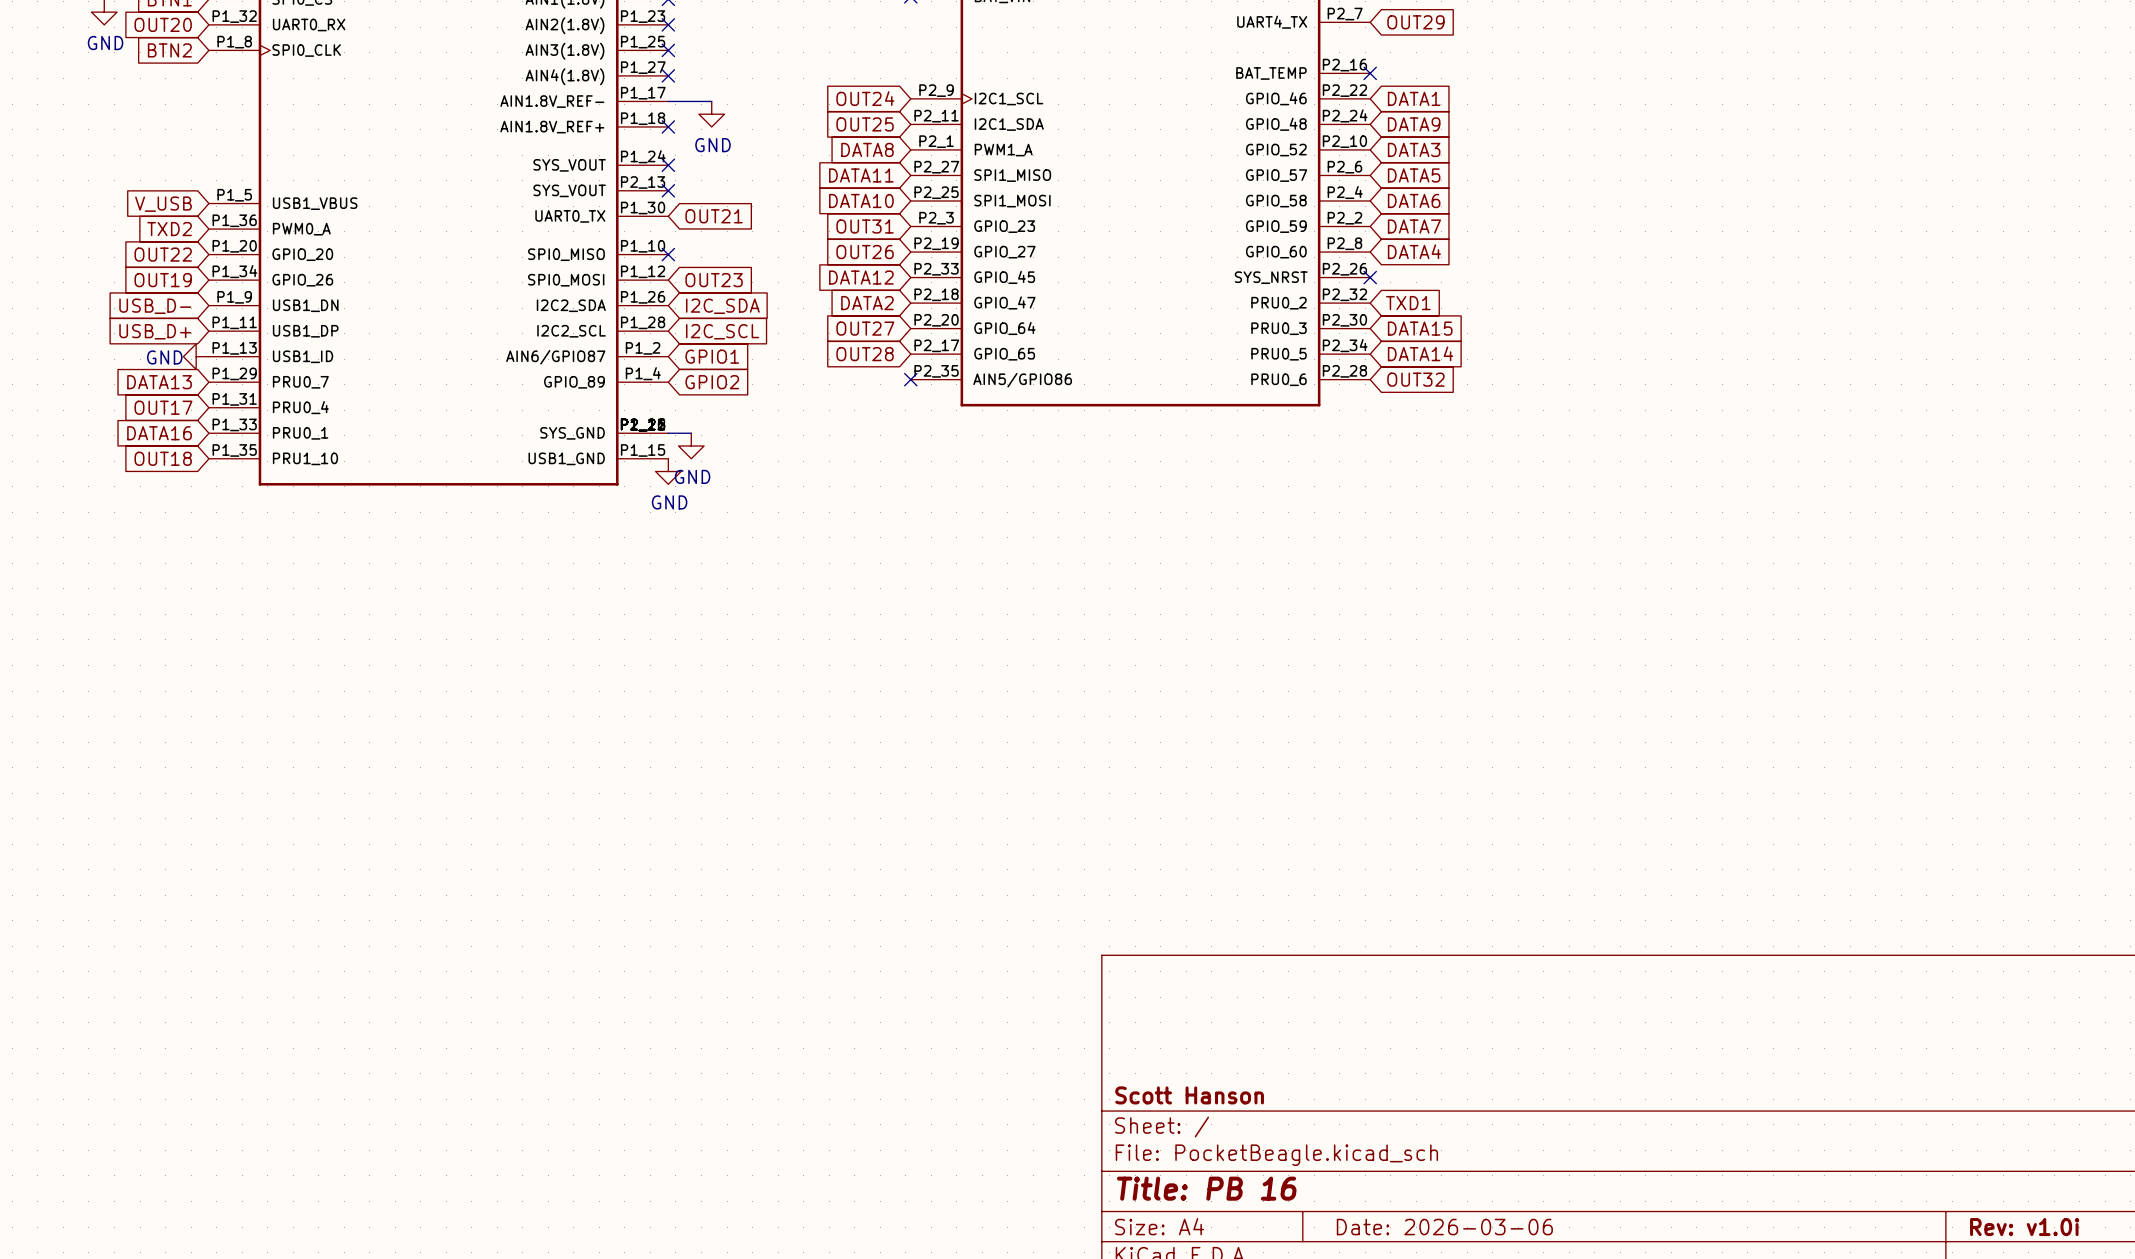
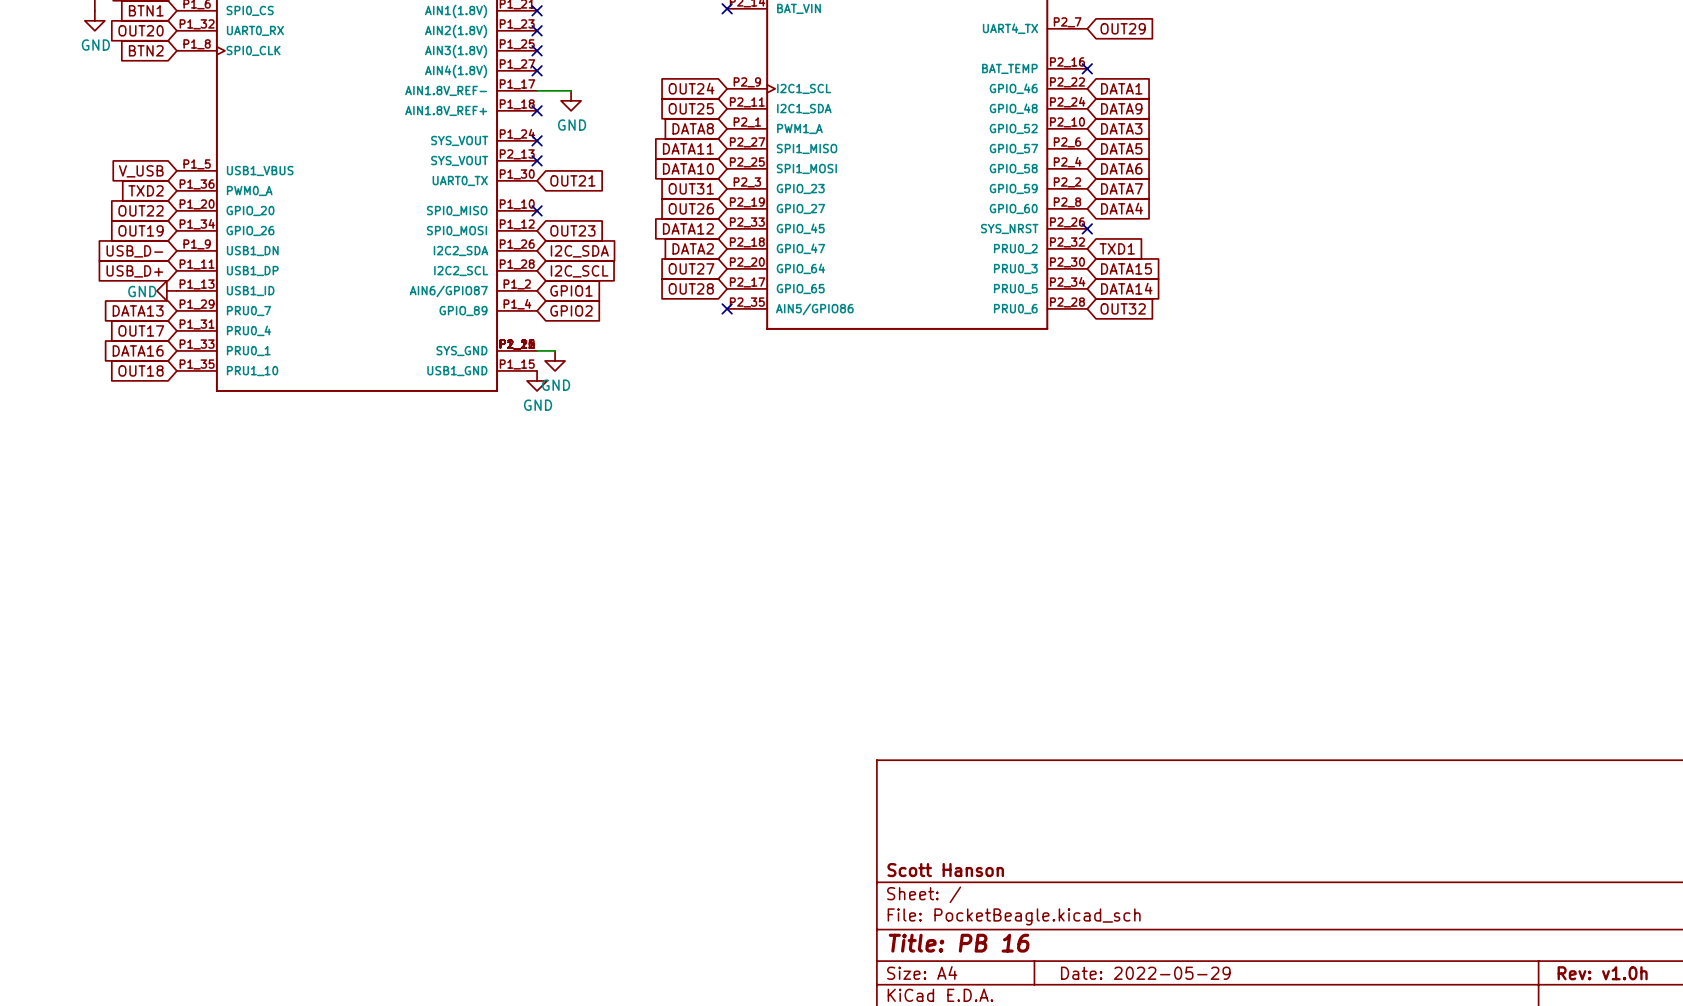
title block: Date: 2026-03-06 (1444, 1227) -> Date: 2022-05-29 (1145, 973)
title block: Rev: v1.0i (2024, 1227) -> Rev: v1.0h (1602, 973)

